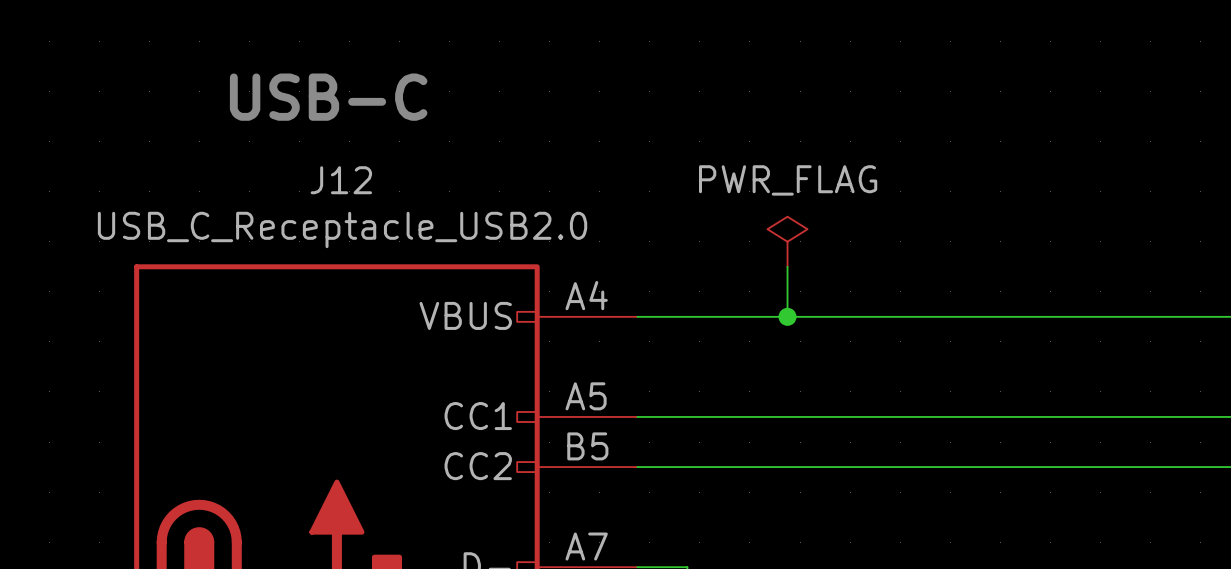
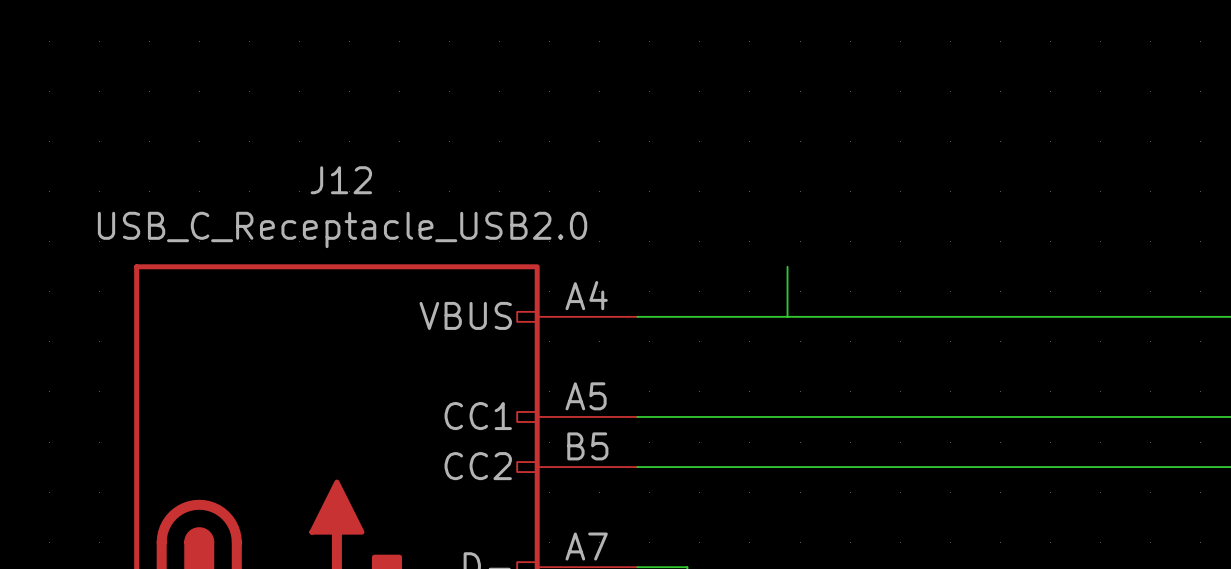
text: USB-C (328, 97) -> none
power symbol: PWR_FLAG (787, 241) -> none
junction: (787, 316) -> none

